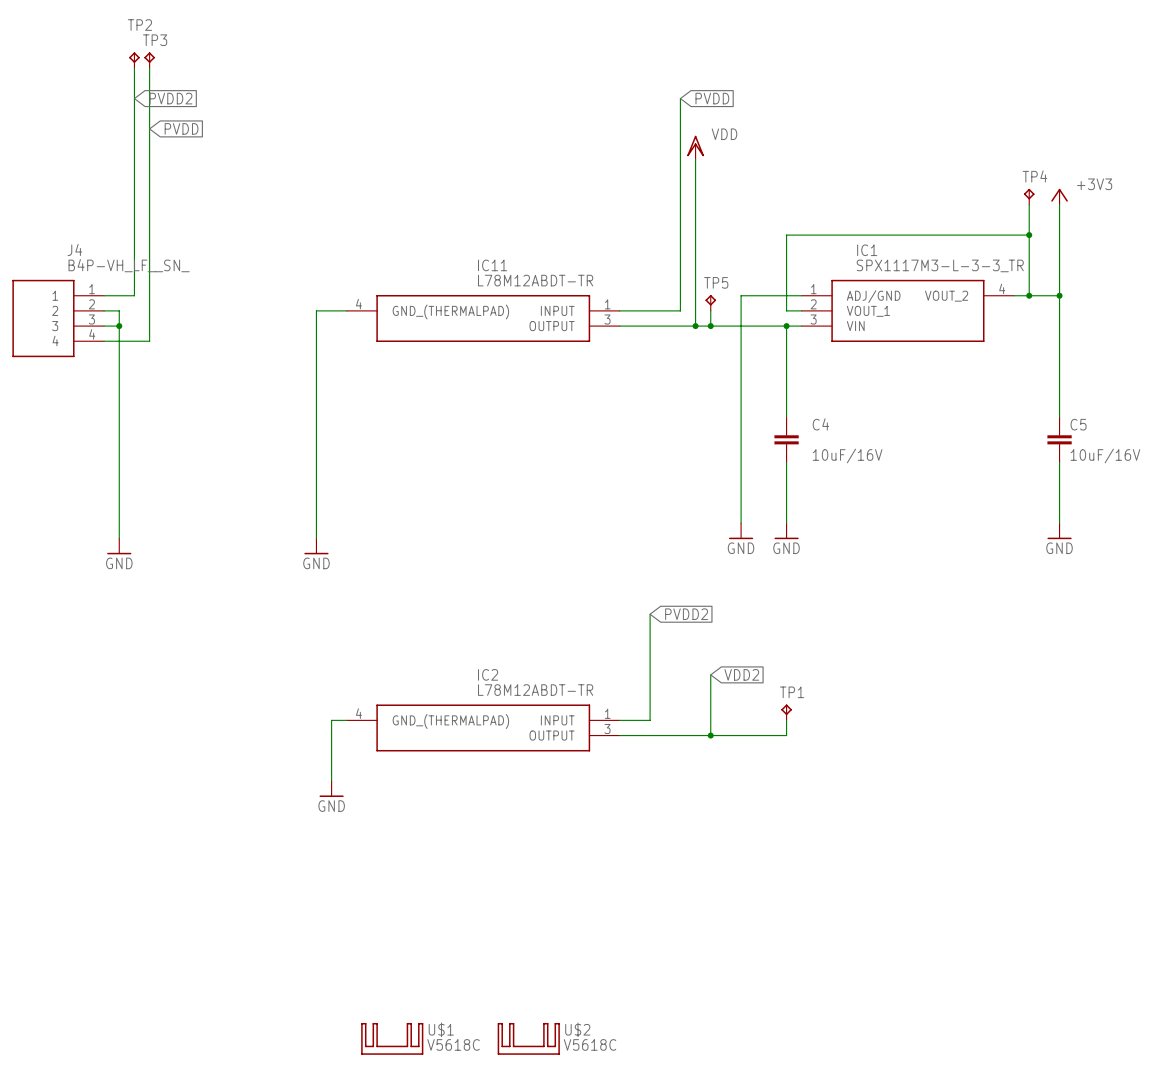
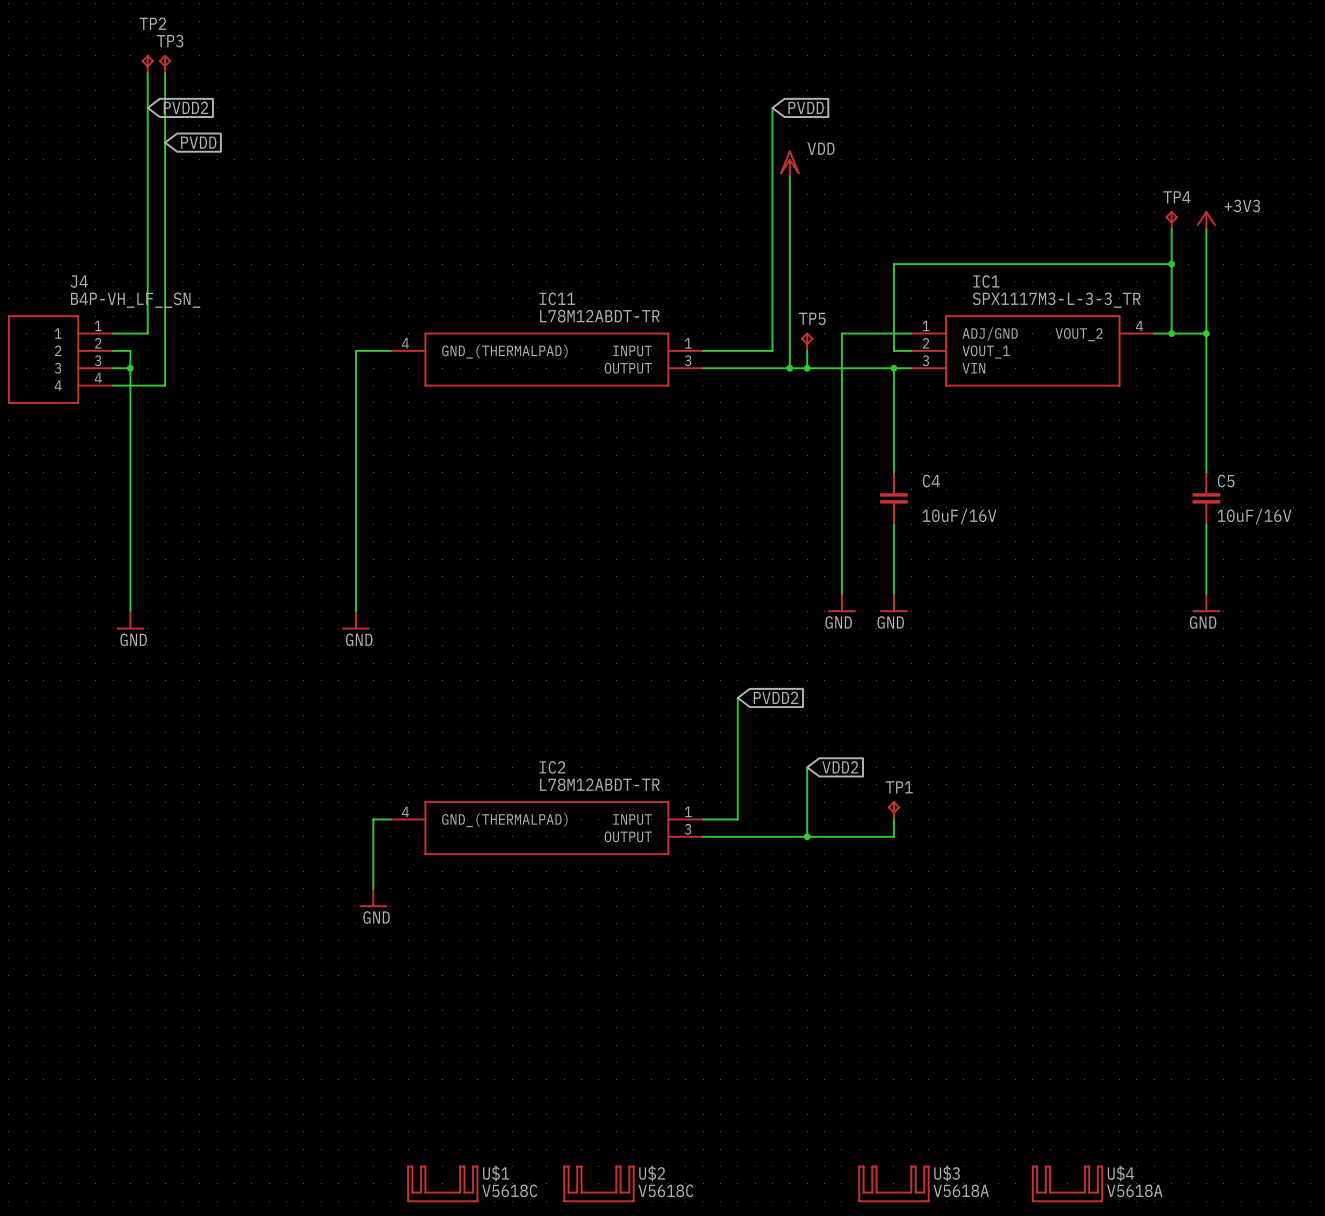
U$3: none -> V5618A (893, 1183)
U$4: none -> V5618A (1067, 1183)

